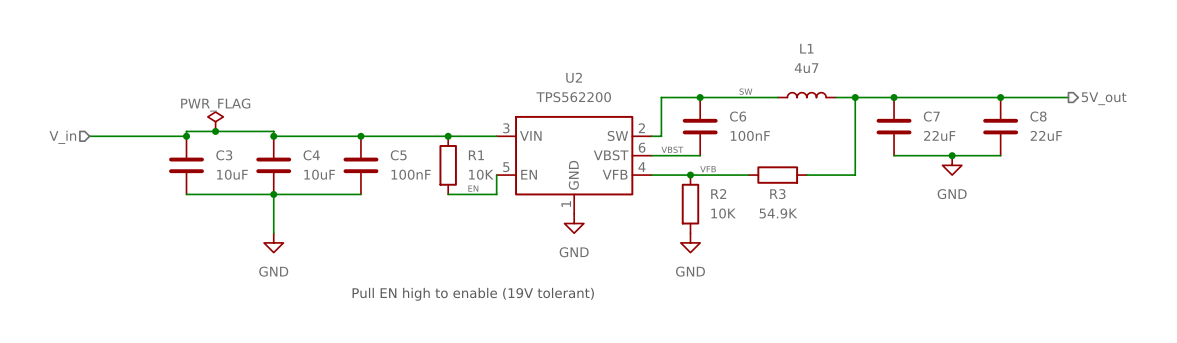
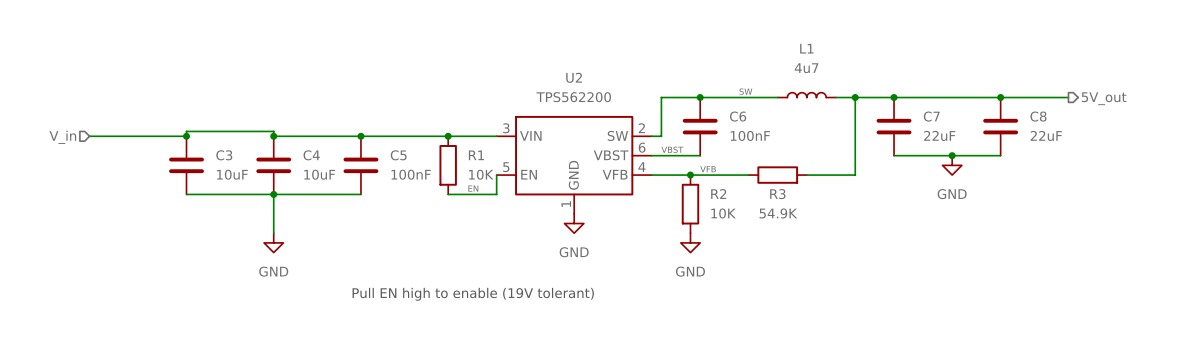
power symbol: PWR_FLAG (215, 121) -> none
junction: (215, 131) -> none

